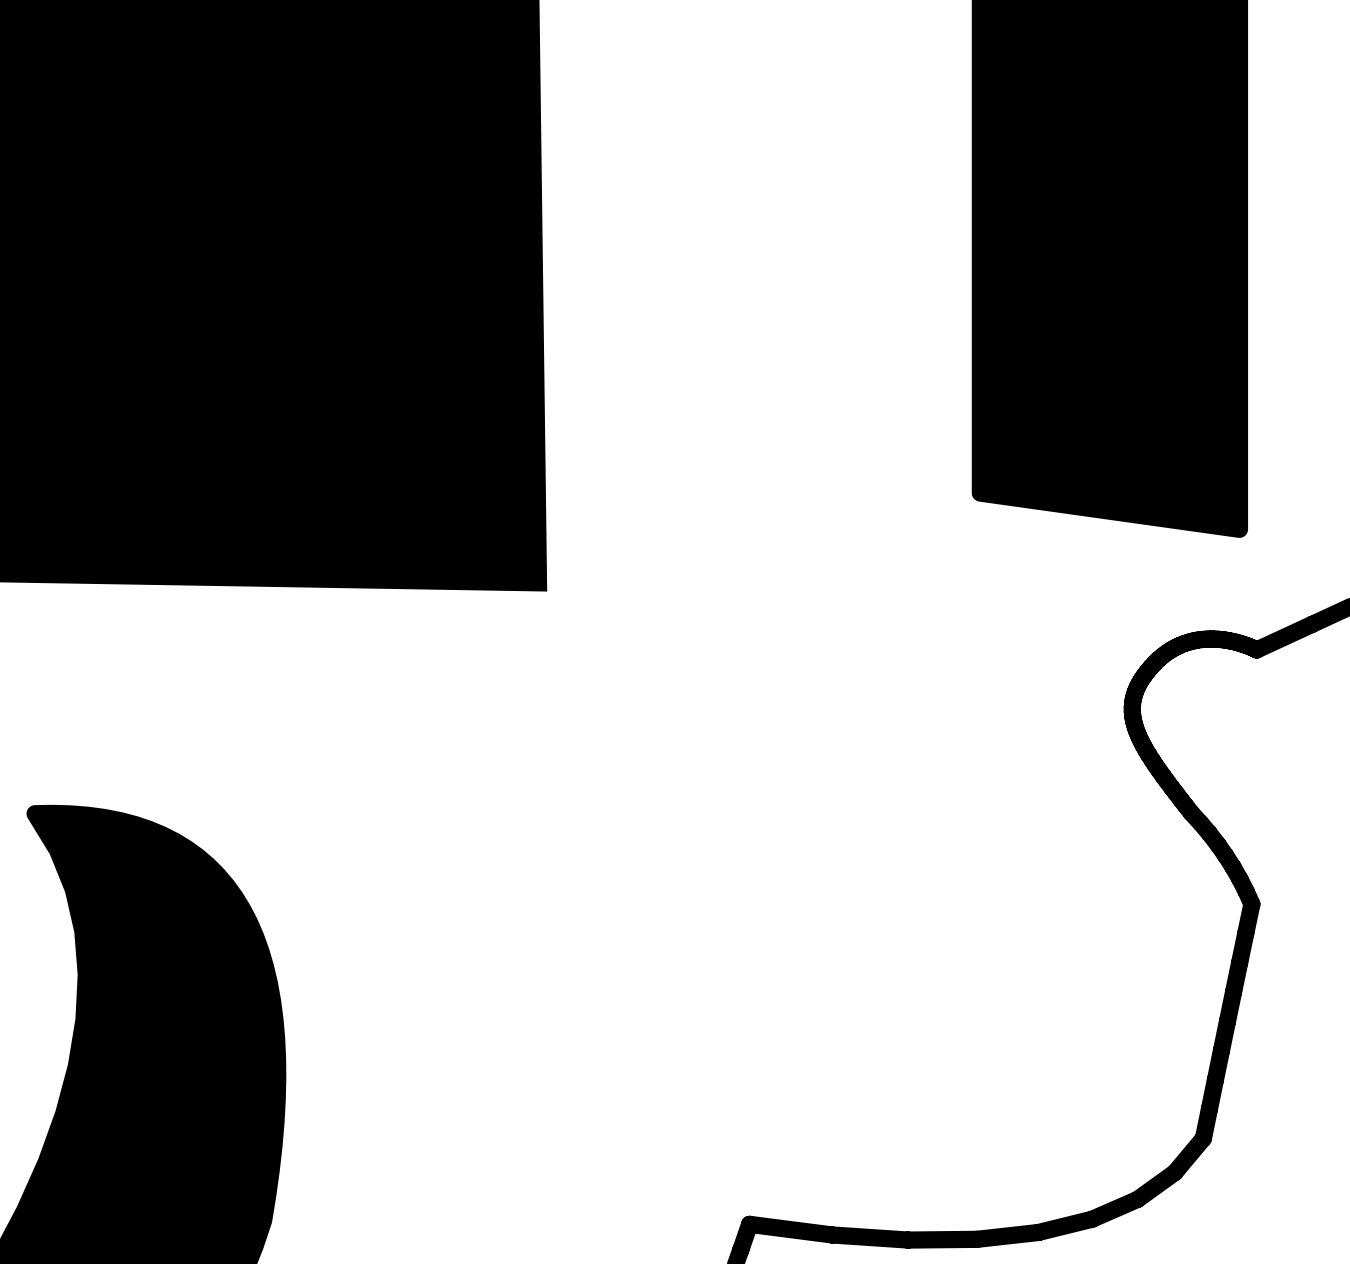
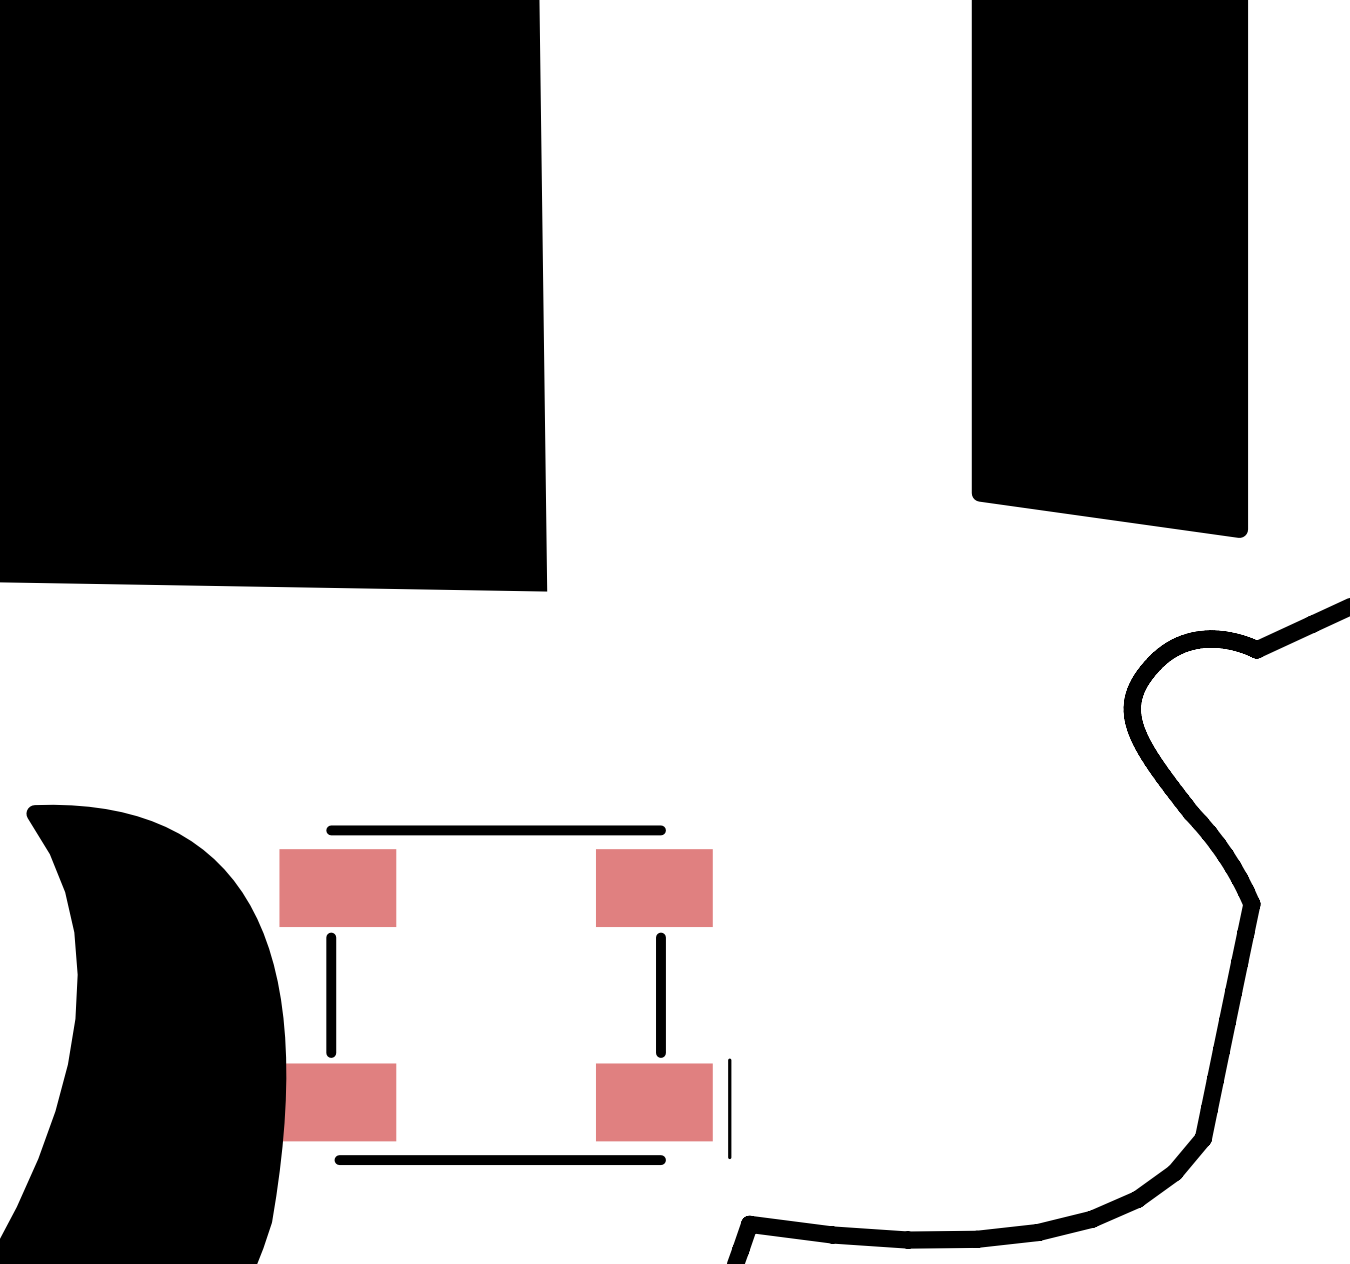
part: none -> (505, 995)

